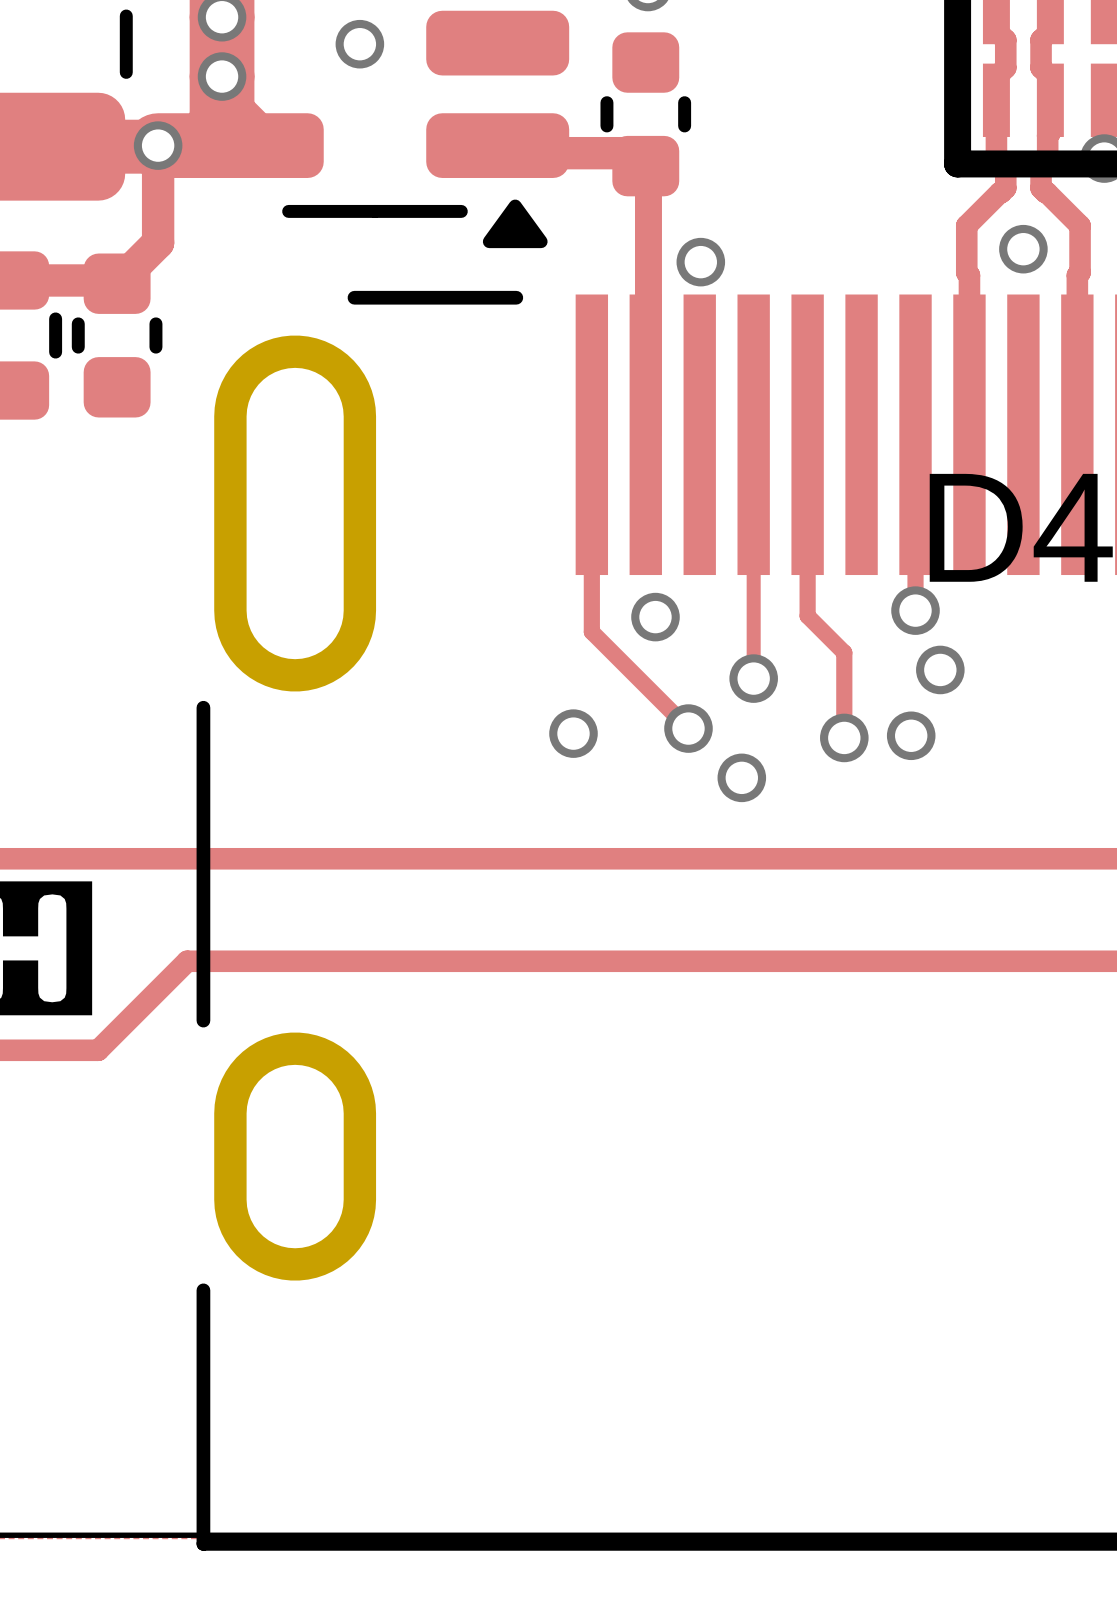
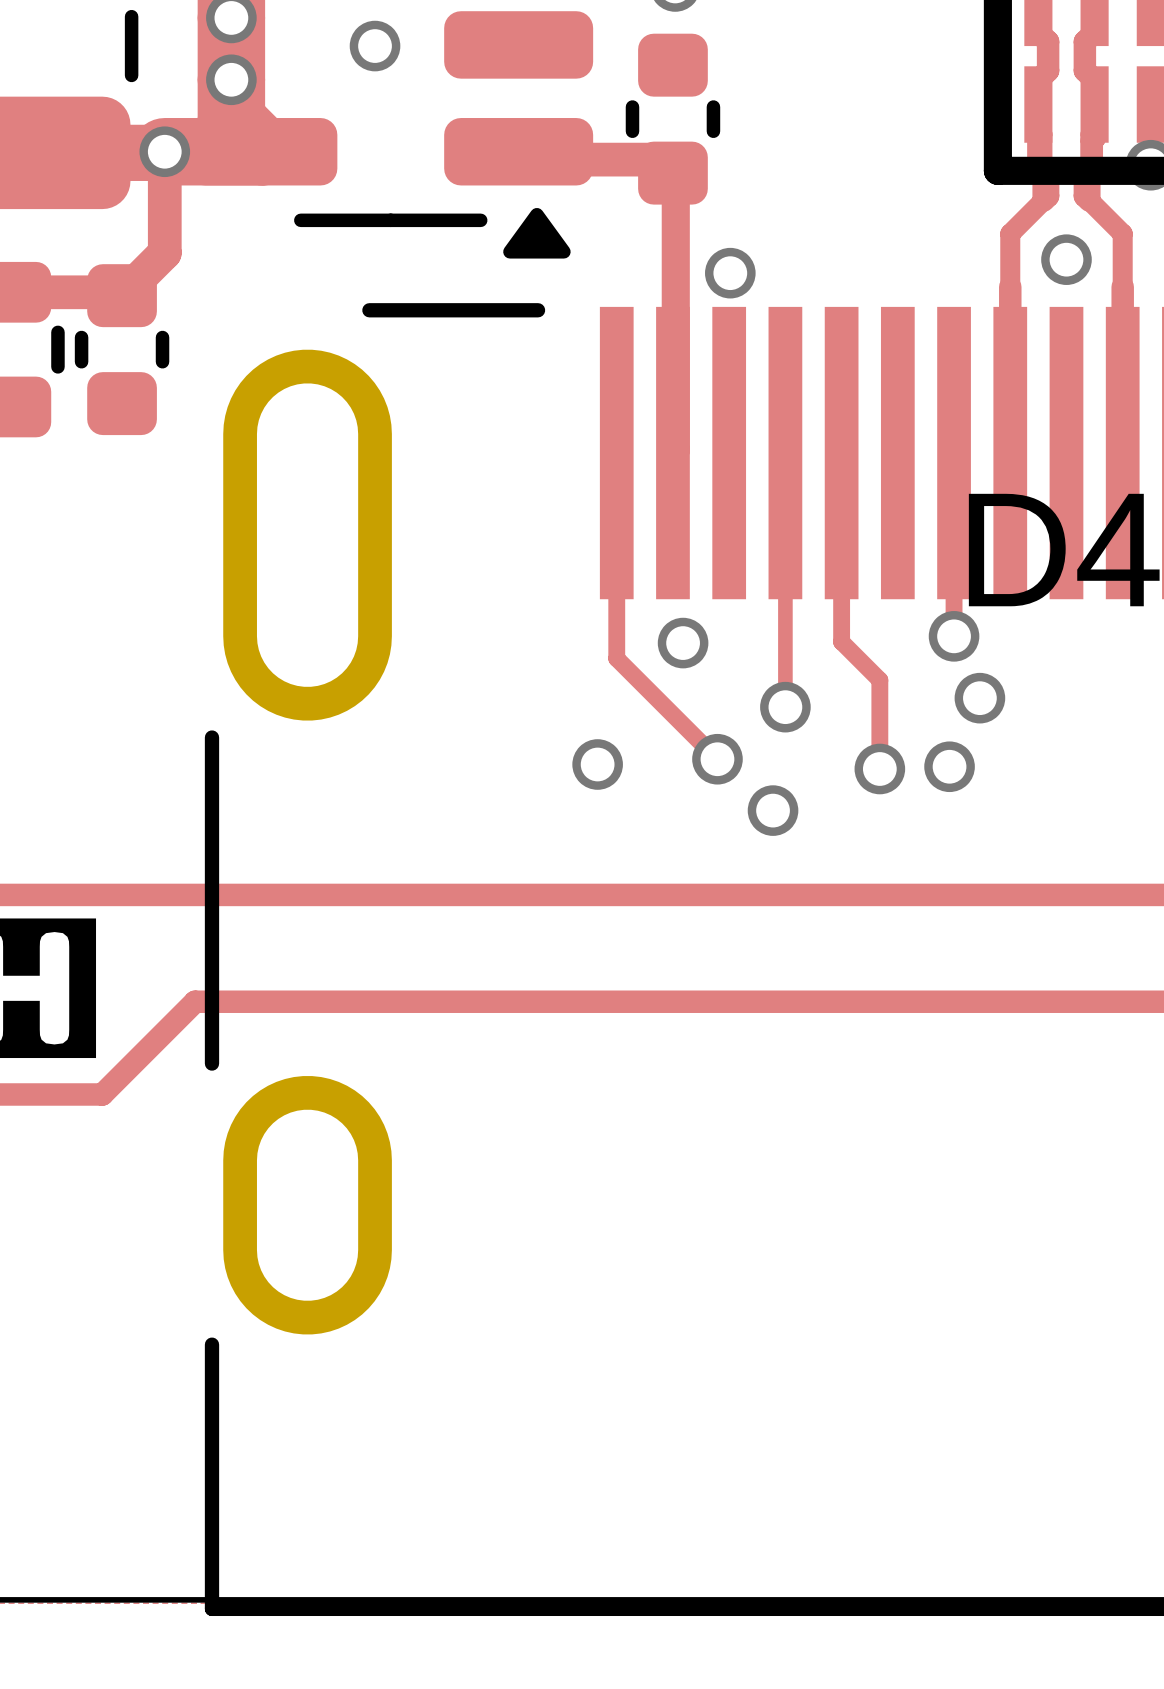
track: (999, 192) (966, 225) (966, 272) (969, 275) -> (1038, 130) (1042, 134) (1042, 201) (1010, 233) (1010, 286)
track: (1046, 192) (1080, 225) (1080, 272) (1077, 275) -> (1094, 130) (1090, 134) (1090, 201) (1122, 233) (1122, 286)

